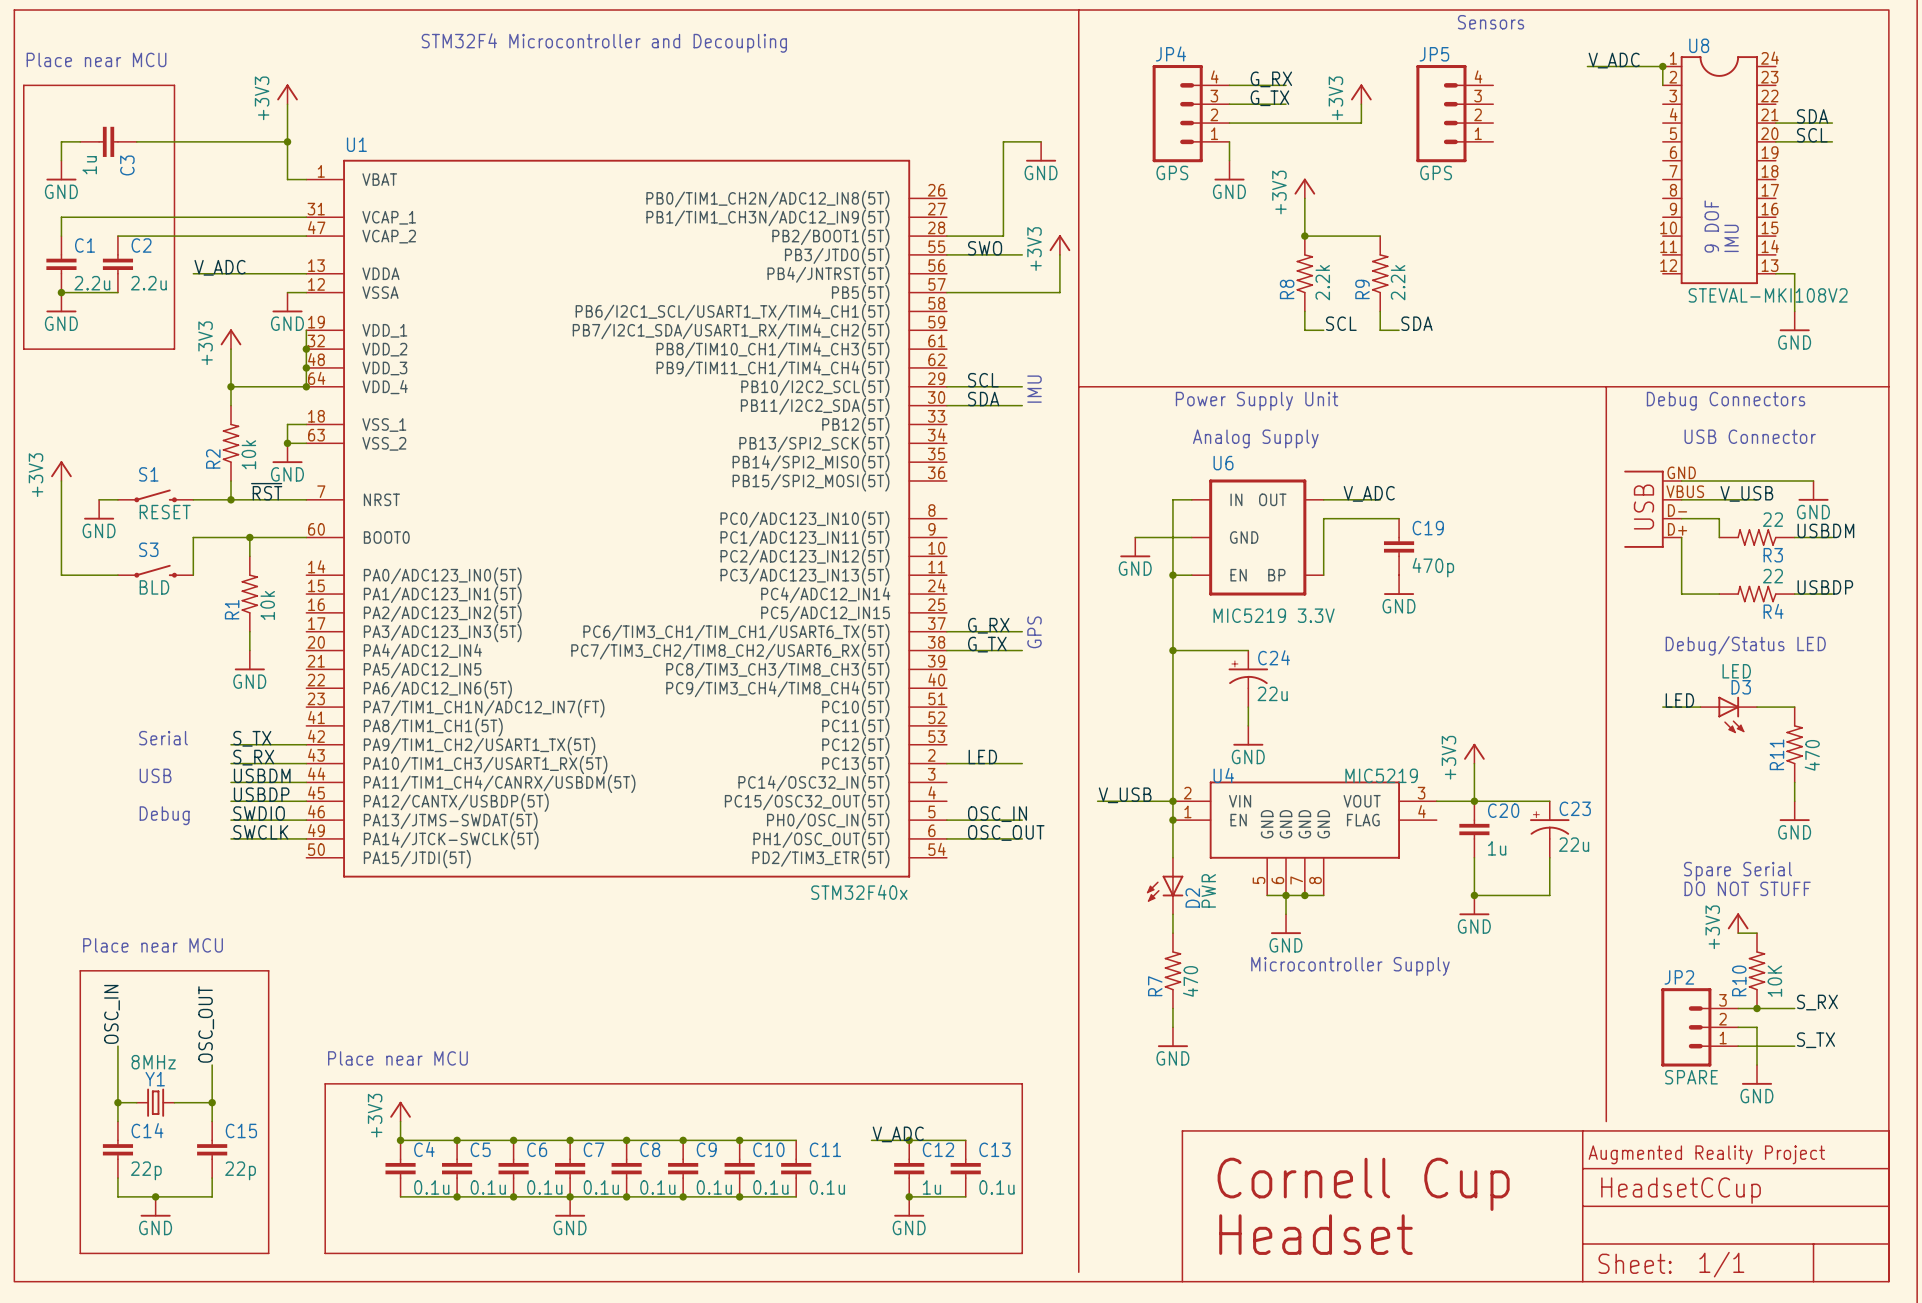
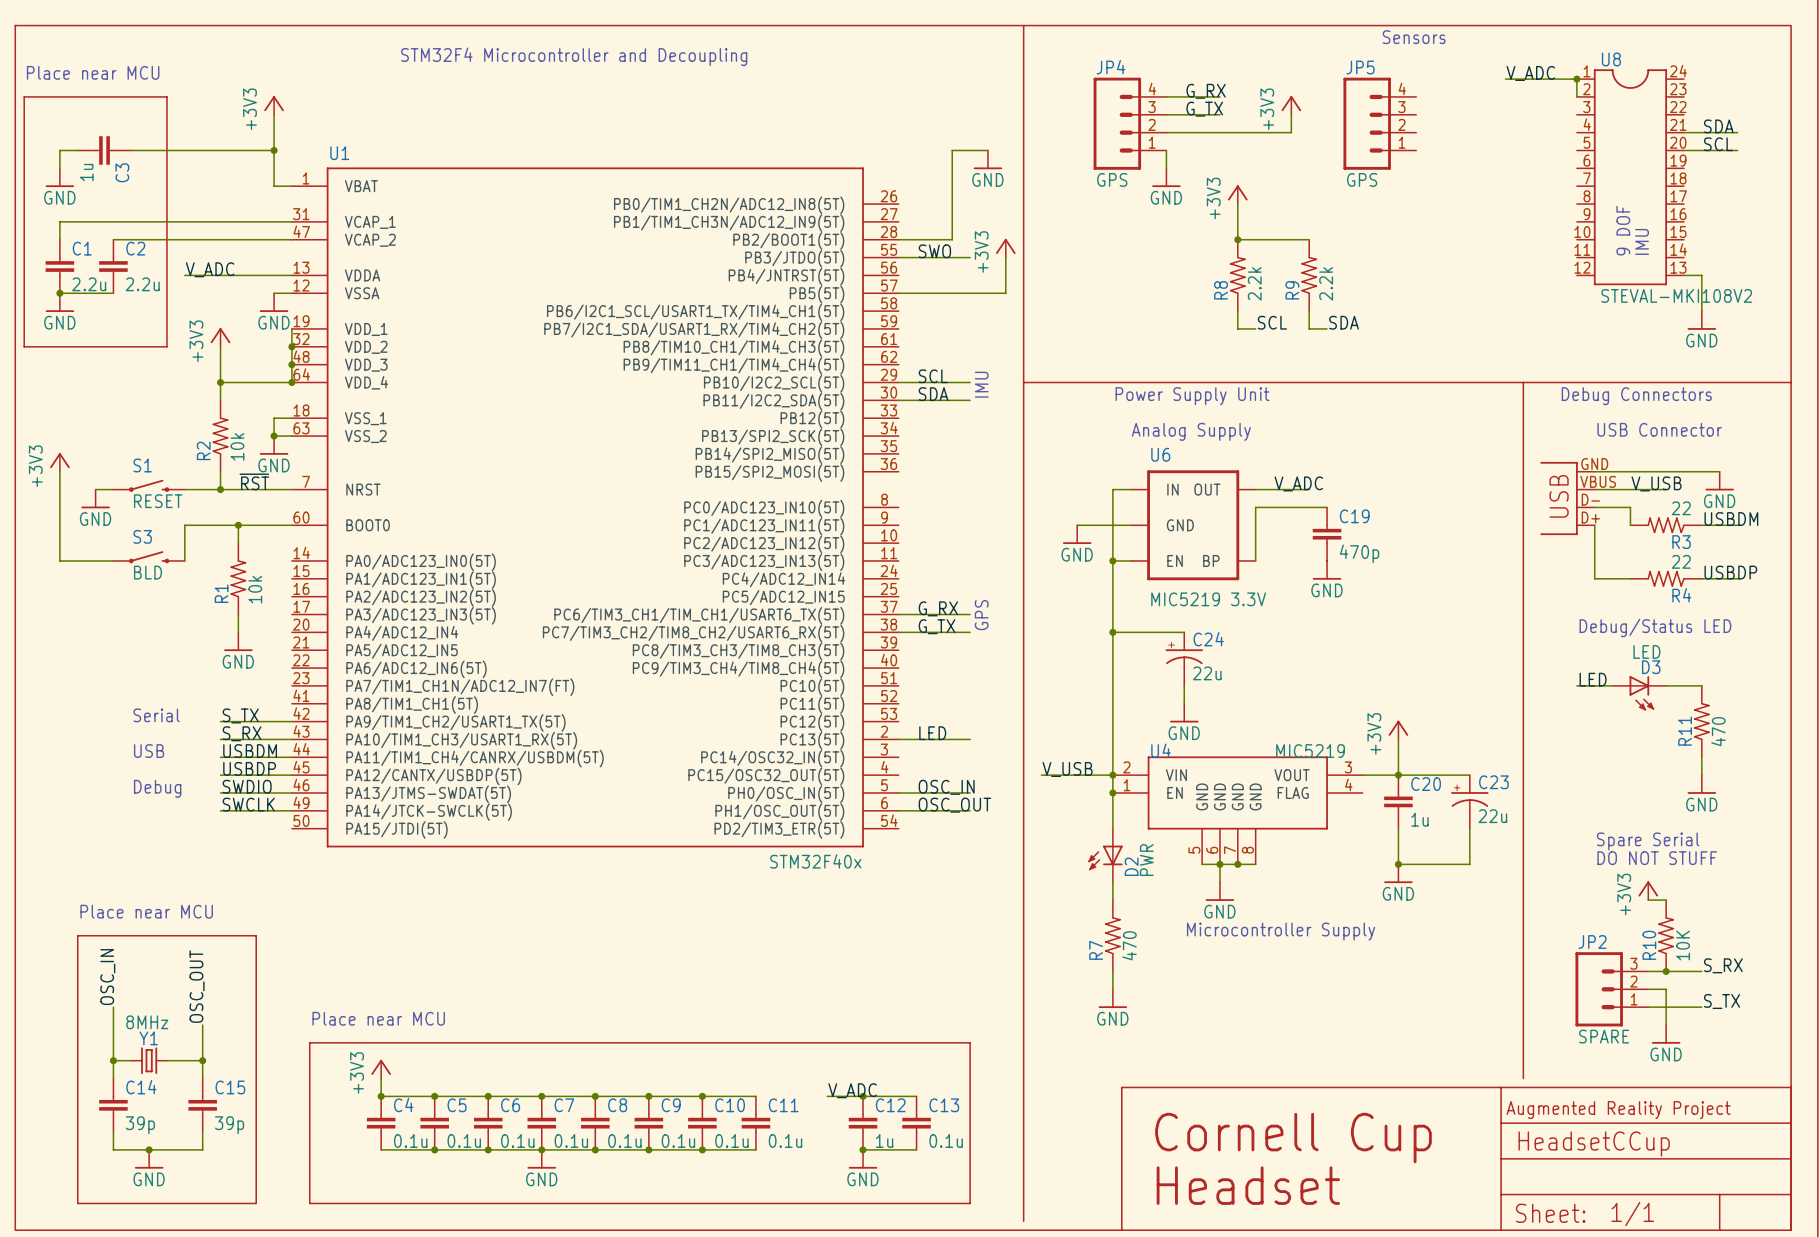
C14 value: 22p (146, 1170) -> 39p (140, 1125)
C15 value: 22p (240, 1170) -> 39p (229, 1125)

